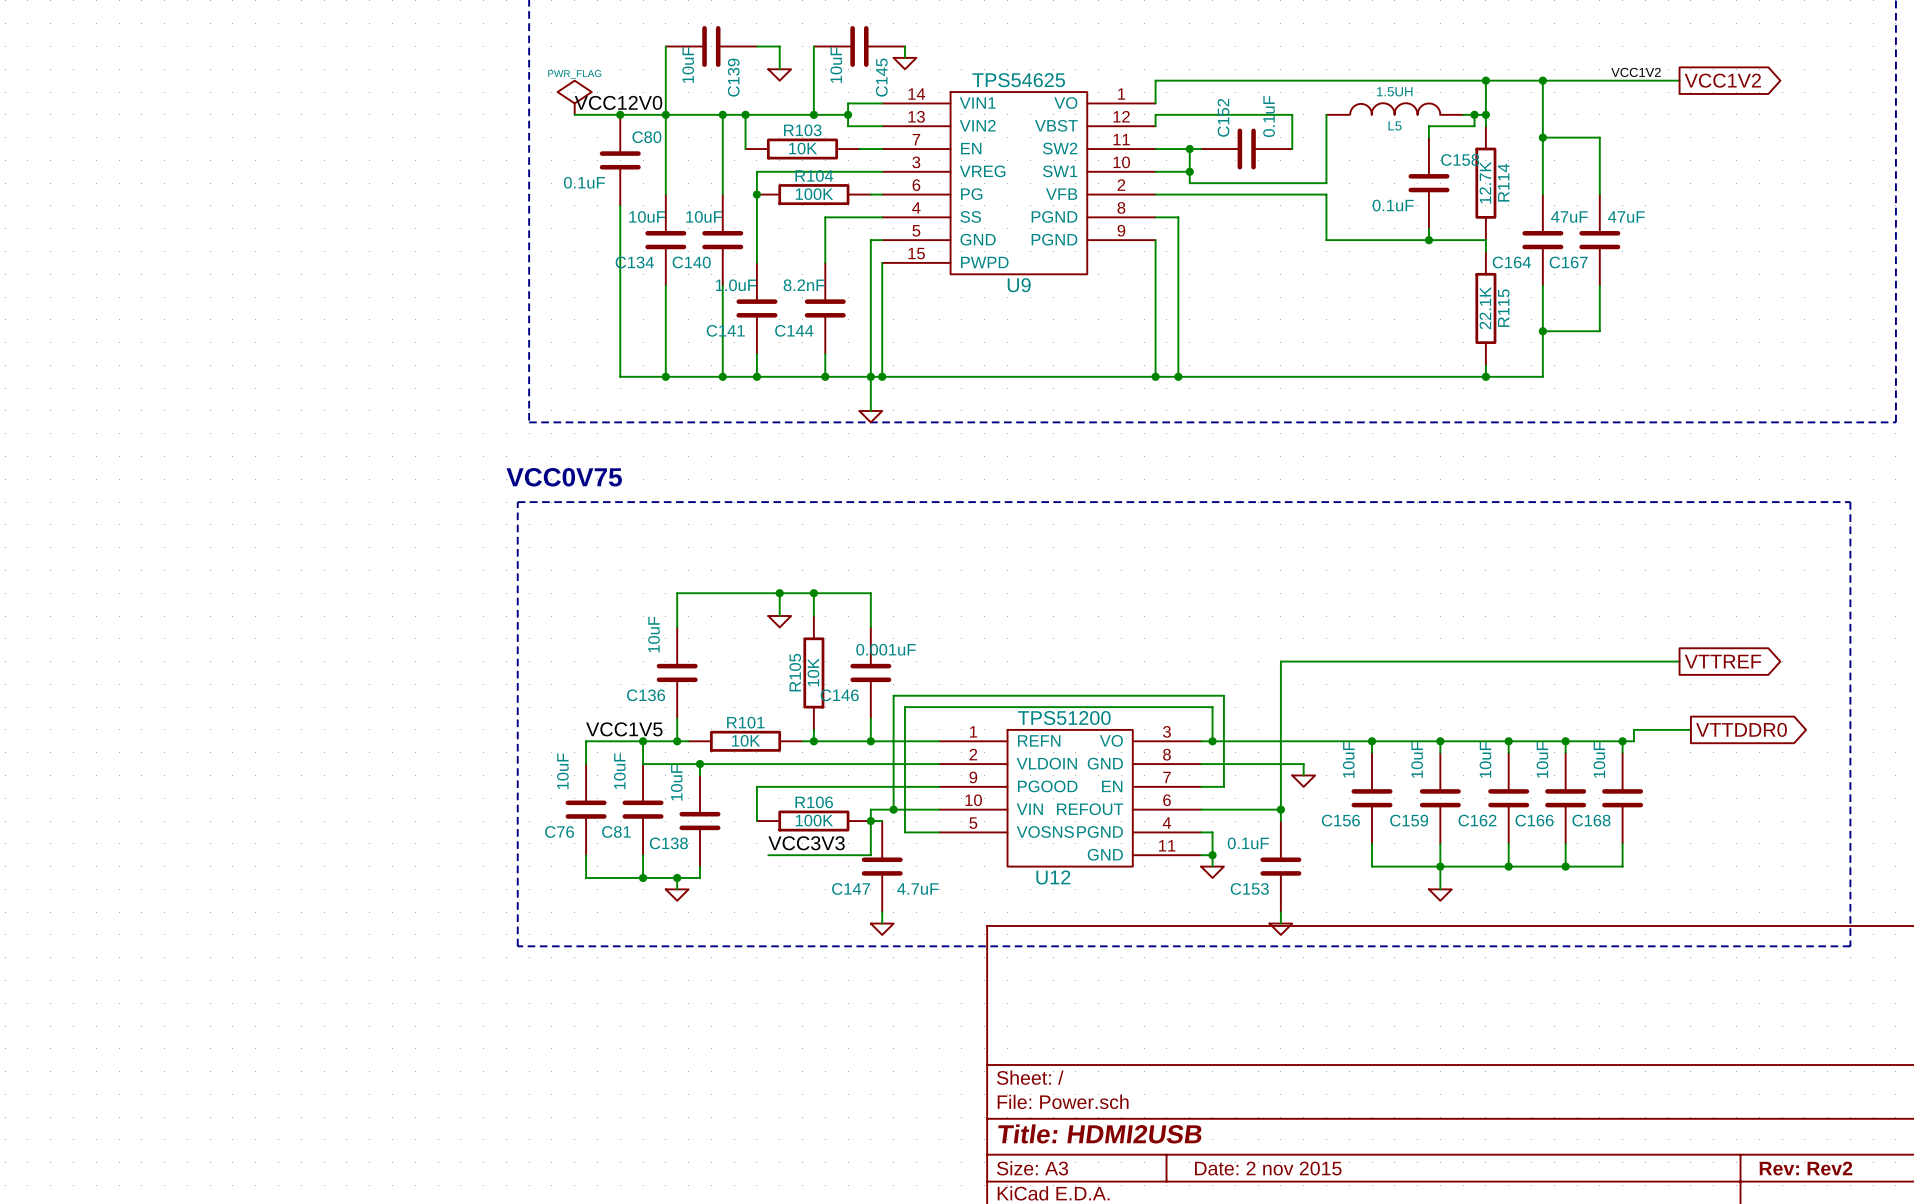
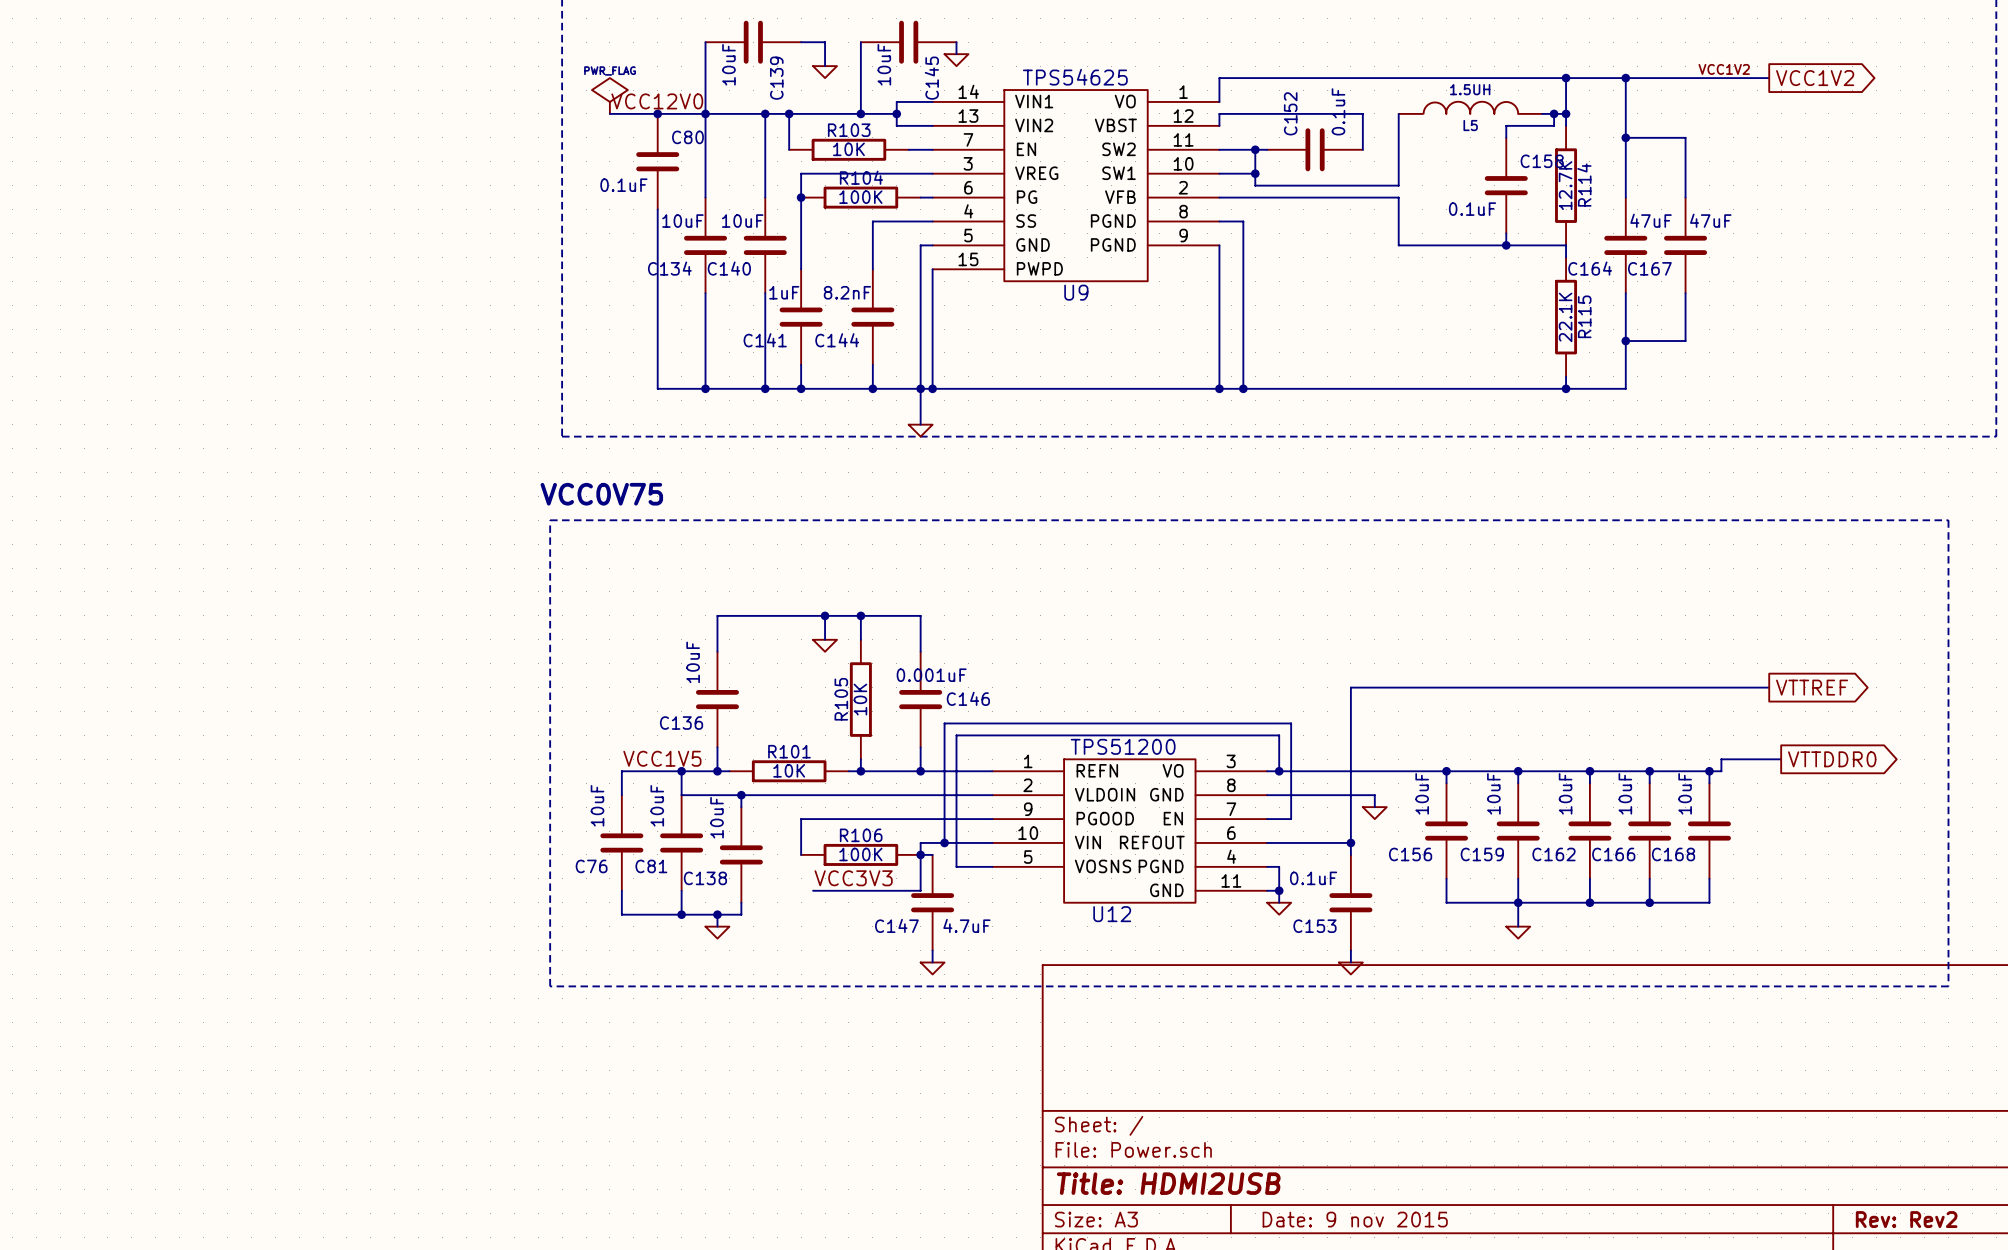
C141 value: 1.0uF (736, 285) -> 1uF (784, 292)
C146 name position: C146 (839, 695) -> C146 (968, 698)
title block: Date: 2 nov 2015 (1268, 1168) -> Date: 9 nov 2015 (1355, 1219)

